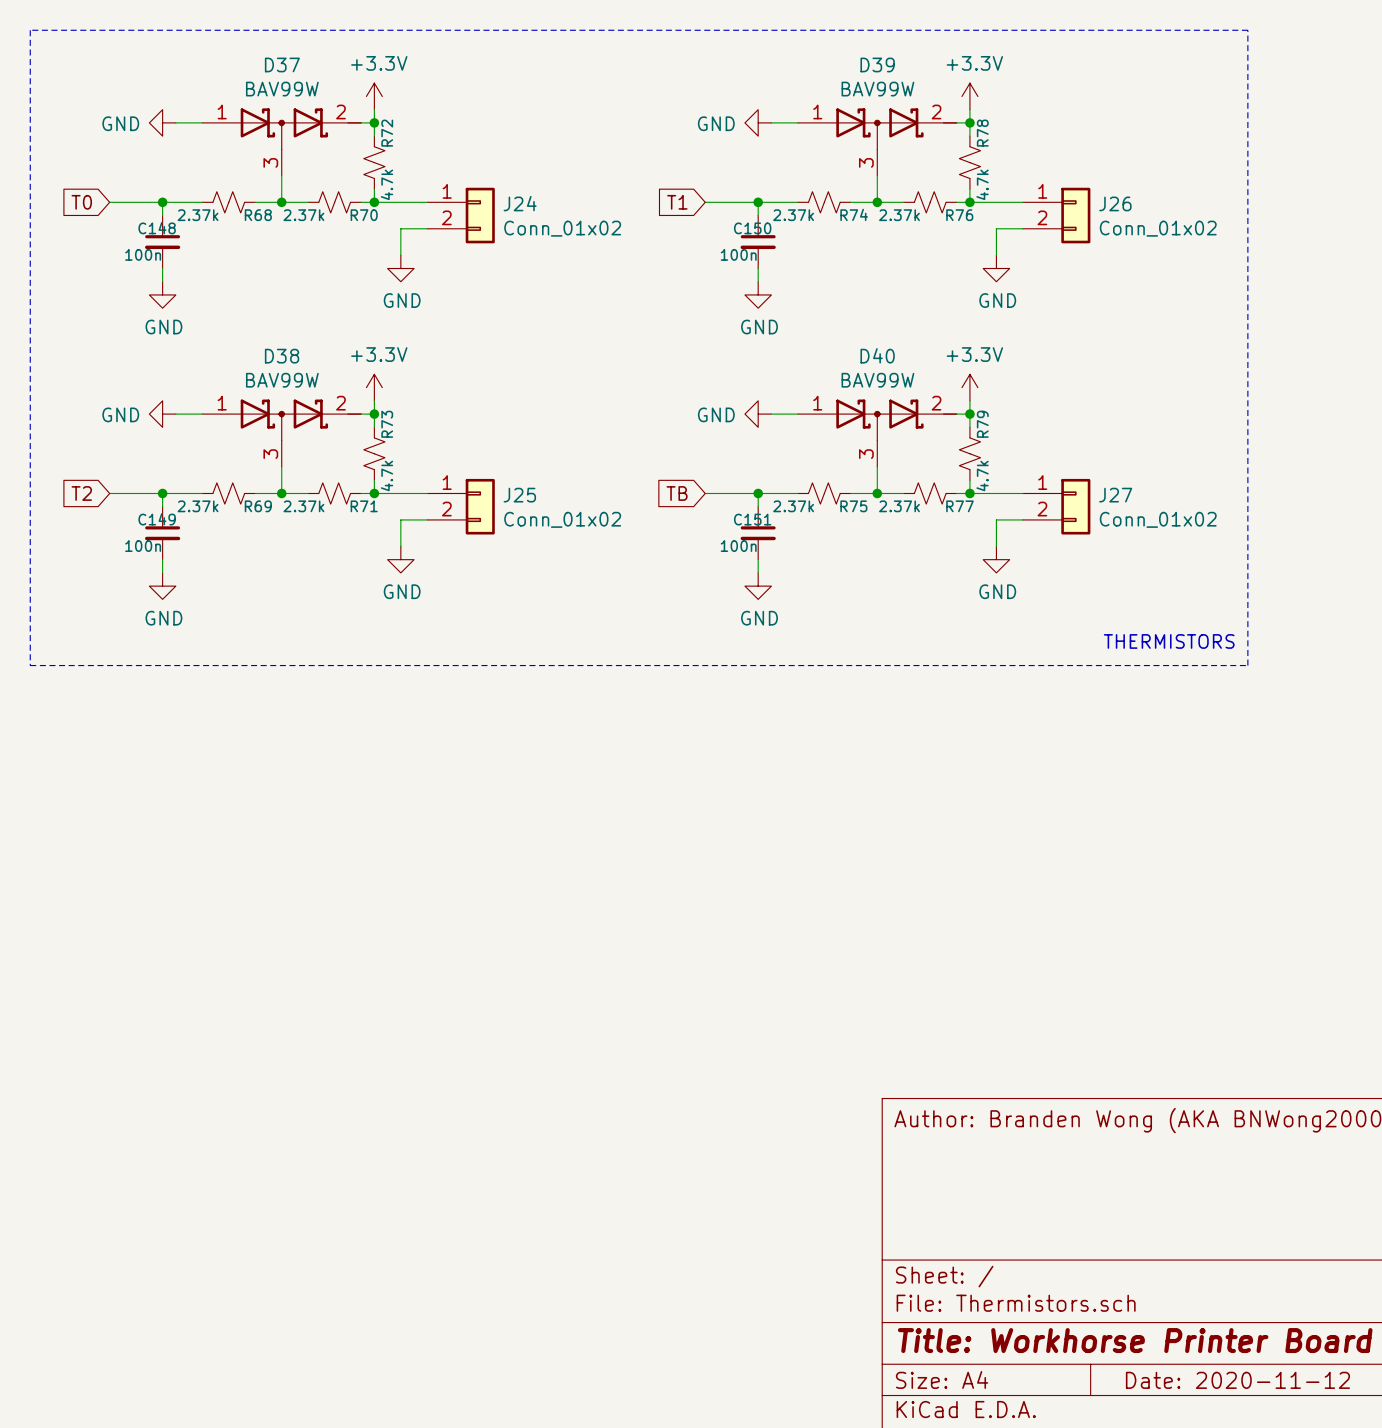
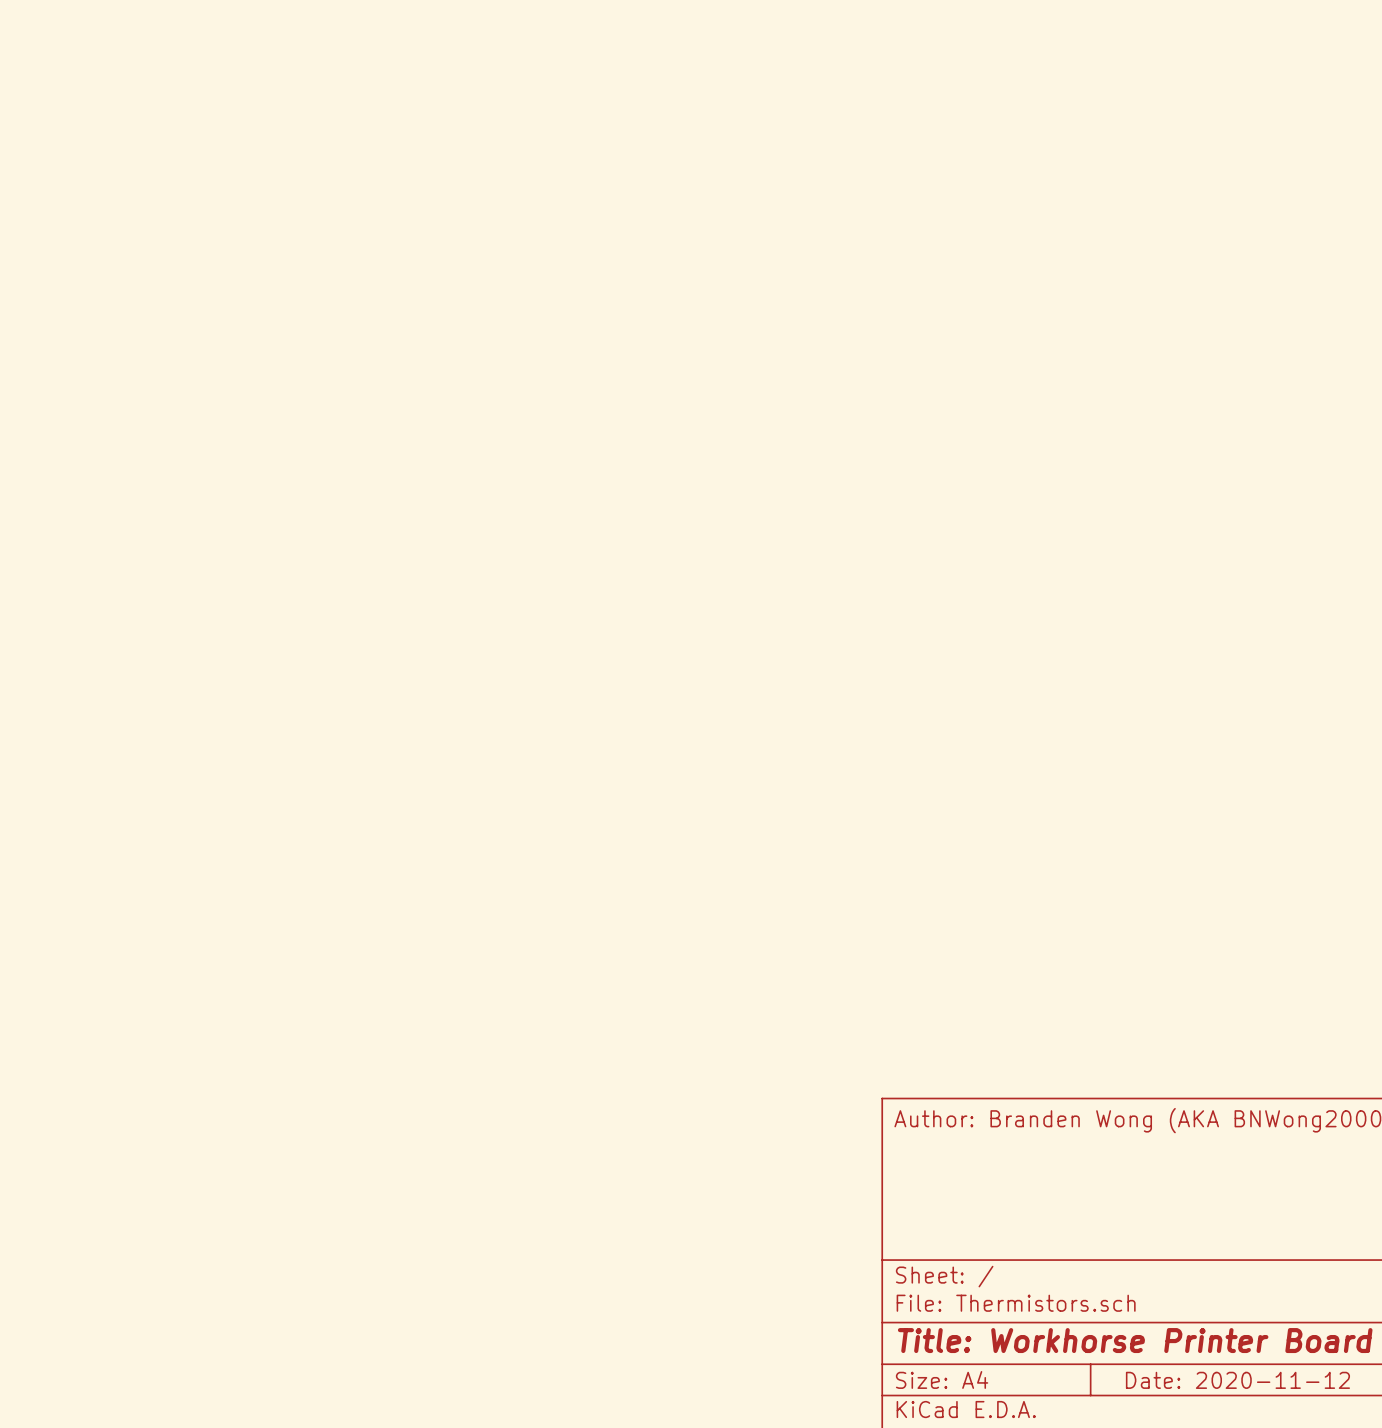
line: (30, 30) (30, 665) (1247, 665) (1247, 30) (30, 30) -> none
power symbol: +3.3V (374, 96) -> none
power symbol: +3.3V (969, 96) -> none
wire: (374, 109) (374, 136) -> none
wire: (969, 109) (969, 136) -> none
power symbol: GND (162, 122) -> none
wire: (175, 122) (202, 122) -> none
wire: (361, 122) (374, 122) -> none
junction: (374, 122) -> none
power symbol: GND (758, 122) -> none
wire: (771, 122) (797, 122) -> none
wire: (956, 122) (969, 122) -> none
junction: (969, 122) -> none
D37: BAV99W (281, 142) -> none
D39: BAV99W (877, 142) -> none
R72: 4.7k (374, 162) -> none
R78: 4.7k (969, 162) -> none
wire: (281, 175) (281, 202) -> none
wire: (877, 175) (877, 202) -> none
wire: (374, 189) (374, 202) -> none
wire: (969, 189) (969, 202) -> none
global label: T0 (81, 202) -> none
wire: (109, 202) (202, 202) -> none
wire: (162, 202) (162, 215) -> none
junction: (162, 202) -> none
R68: 2.37k (228, 202) -> none
wire: (255, 202) (308, 202) -> none
junction: (281, 202) -> none
R70: 2.37k (334, 202) -> none
wire: (361, 202) (427, 202) -> none
junction: (374, 202) -> none
global label: T1 (677, 202) -> none
wire: (705, 202) (797, 202) -> none
wire: (758, 202) (758, 215) -> none
junction: (758, 202) -> none
R74: 2.37k (824, 202) -> none
wire: (850, 202) (903, 202) -> none
junction: (877, 202) -> none
R76: 2.37k (930, 202) -> none
wire: (956, 202) (1022, 202) -> none
junction: (969, 202) -> none
J24: Conn_01x02 (461, 215) -> none
J26: Conn_01x02 (1056, 215) -> none
wire: (427, 228) (400, 228) (400, 255) -> none
wire: (1022, 228) (996, 228) (996, 255) -> none
C148: 100n (162, 242) -> none
C150: 100n (758, 242) -> none
wire: (162, 268) (162, 281) -> none
power symbol: GND (400, 268) -> none
wire: (758, 268) (758, 281) -> none
power symbol: GND (996, 268) -> none
power symbol: GND (162, 294) -> none
power symbol: GND (758, 294) -> none
power symbol: +3.3V (374, 387) -> none
power symbol: +3.3V (969, 387) -> none
wire: (374, 400) (374, 427) -> none
wire: (969, 400) (969, 427) -> none
power symbol: GND (162, 414) -> none
wire: (175, 414) (202, 414) -> none
wire: (361, 414) (374, 414) -> none
junction: (374, 414) -> none
power symbol: GND (758, 414) -> none
wire: (771, 414) (797, 414) -> none
wire: (956, 414) (969, 414) -> none
junction: (969, 414) -> none
D38: BAV99W (281, 433) -> none
D40: BAV99W (877, 433) -> none
R73: 4.7k (374, 453) -> none
R79: 4.7k (969, 453) -> none
wire: (281, 467) (281, 493) -> none
wire: (877, 467) (877, 493) -> none
wire: (374, 480) (374, 493) -> none
wire: (969, 480) (969, 493) -> none
global label: T2 (81, 493) -> none
wire: (109, 493) (202, 493) -> none
wire: (162, 493) (162, 506) -> none
junction: (162, 493) -> none
R69: 2.37k (228, 493) -> none
wire: (255, 493) (308, 493) -> none
junction: (281, 493) -> none
R71: 2.37k (334, 493) -> none
wire: (361, 493) (427, 493) -> none
junction: (374, 493) -> none
global label: TB (677, 493) -> none
wire: (705, 493) (797, 493) -> none
wire: (758, 493) (758, 506) -> none
junction: (758, 493) -> none
R75: 2.37k (824, 493) -> none
wire: (850, 493) (903, 493) -> none
junction: (877, 493) -> none
R77: 2.37k (930, 493) -> none
wire: (956, 493) (1022, 493) -> none
junction: (969, 493) -> none
J25: Conn_01x02 (461, 506) -> none
J27: Conn_01x02 (1056, 506) -> none
wire: (427, 519) (400, 519) (400, 546) -> none
wire: (1022, 519) (996, 519) (996, 546) -> none
C149: 100n (162, 533) -> none
C151: 100n (758, 533) -> none
wire: (162, 559) (162, 572) -> none
power symbol: GND (400, 559) -> none
wire: (758, 559) (758, 572) -> none
power symbol: GND (996, 559) -> none
power symbol: GND (162, 586) -> none
power symbol: GND (758, 586) -> none
text: THERMISTORS (1169, 641) -> none

